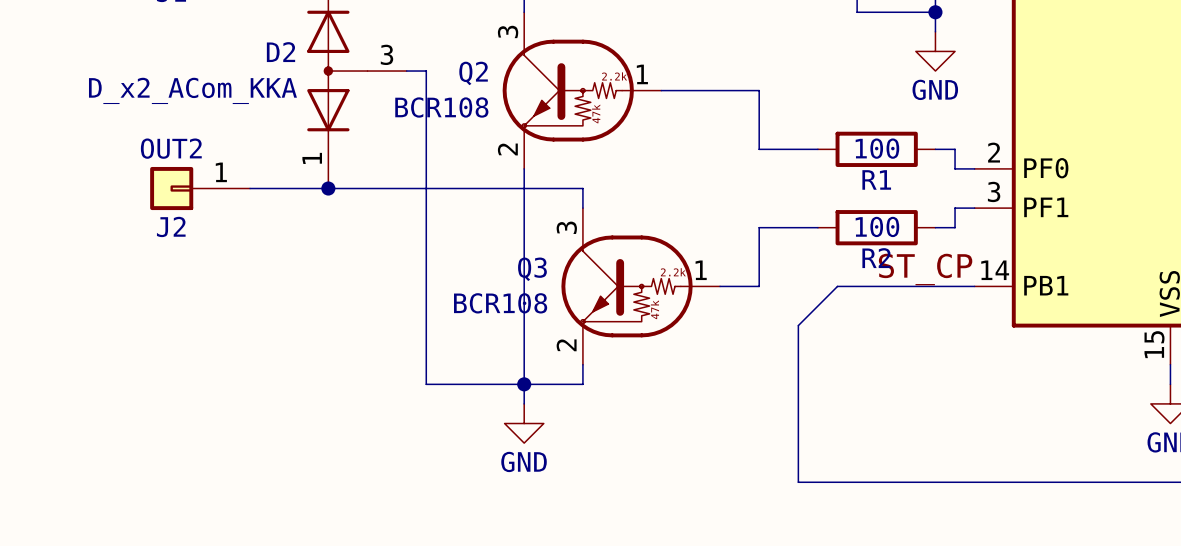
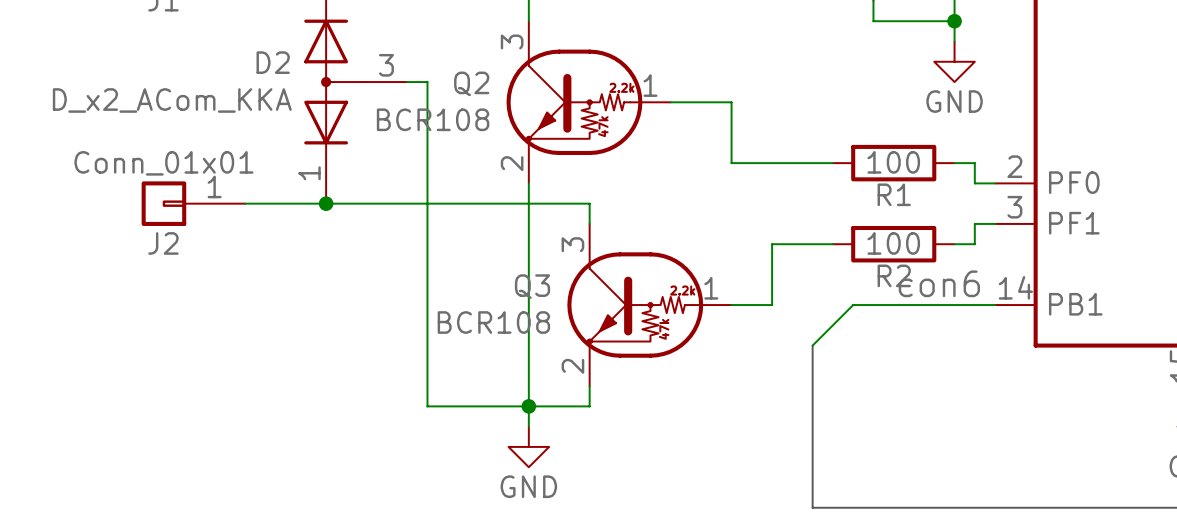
wire: (720, 90) (759, 90) (759, 149) -> (731, 102) (731, 163) (772, 163)
J2 value: OUT2 (171, 148) -> Conn_01x01 (163, 163)
label: ST_CP (925, 269) -> con6 (939, 283)

